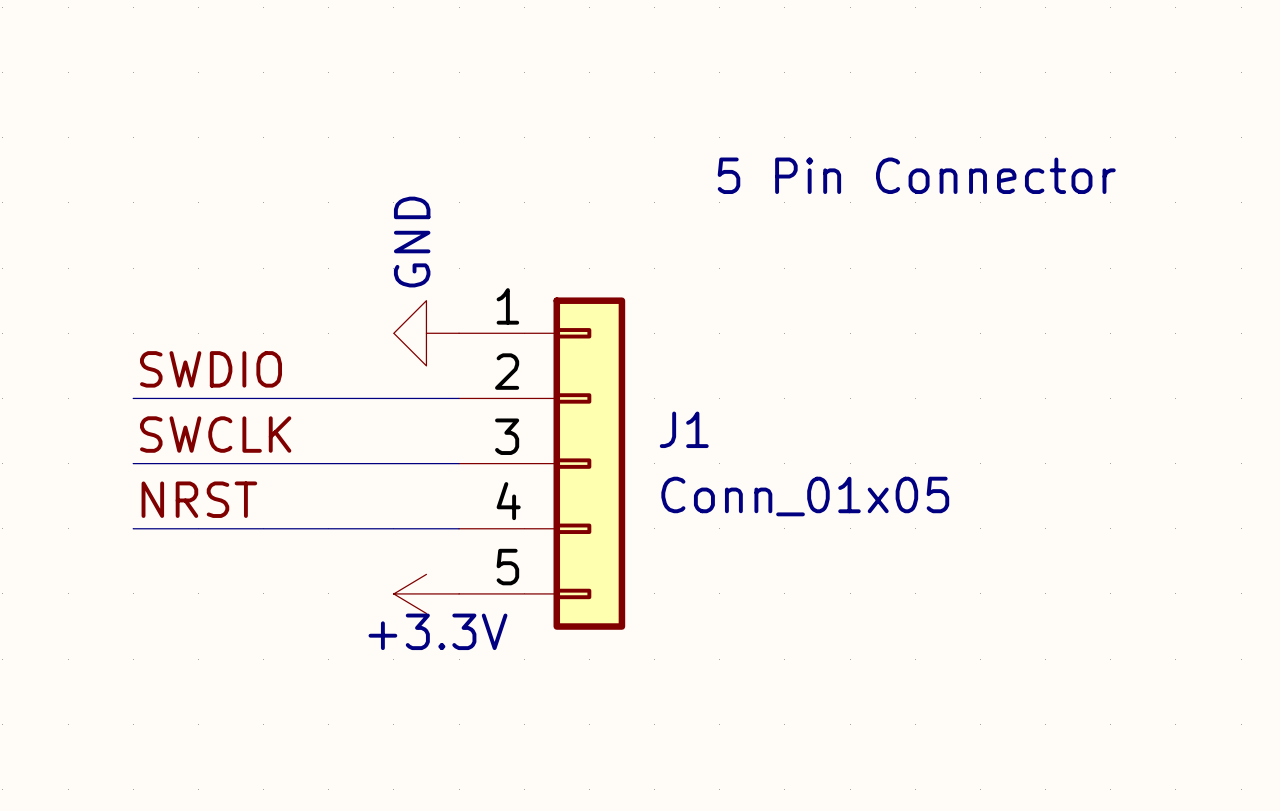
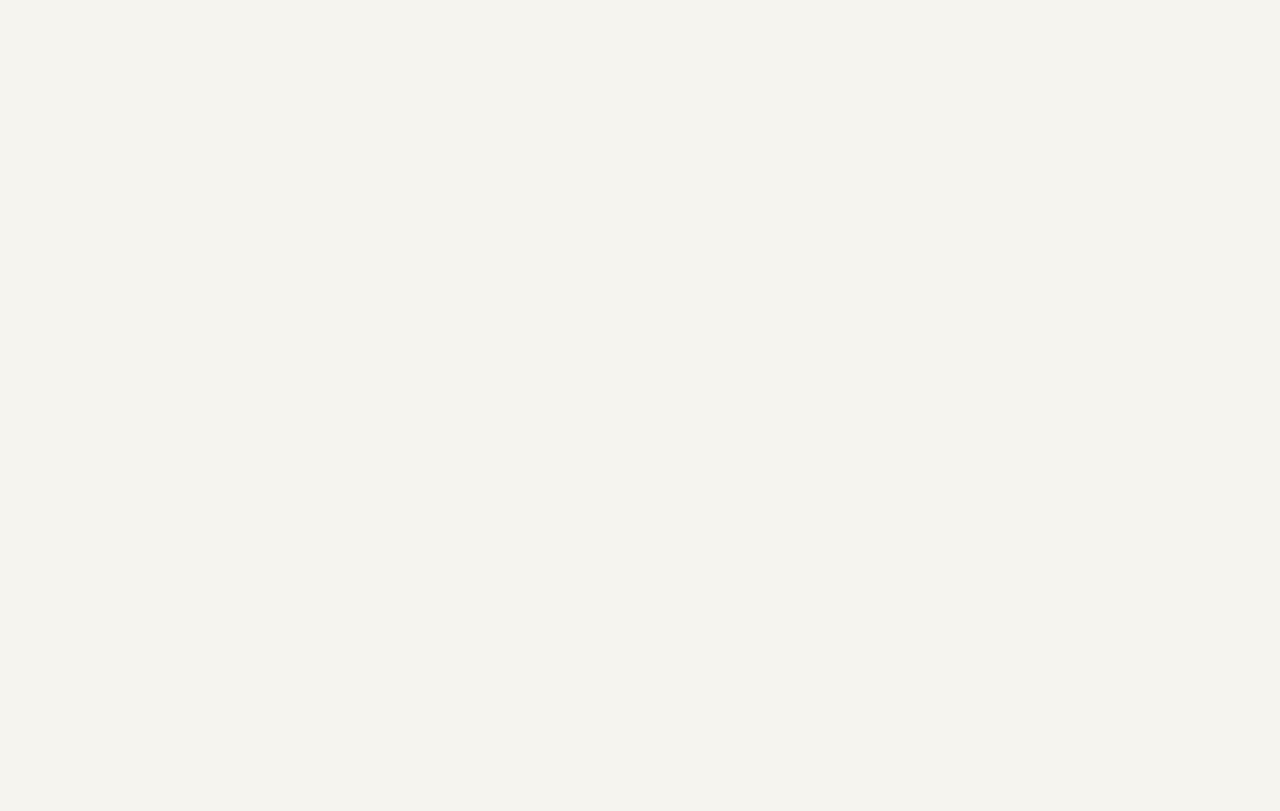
text: 5 Pin Connector (916, 175) -> none
power symbol: GND (426, 333) -> none
label: SWDIO (211, 369) -> none
wire: (133, 398) (459, 398) -> none
label: SWCLK (215, 434) -> none
wire: (133, 463) (459, 463) -> none
J1: Conn_01x05 (542, 463) -> none
label: NRST (199, 499) -> none
wire: (133, 528) (459, 528) -> none
power symbol: +3.3V (426, 593) -> none

